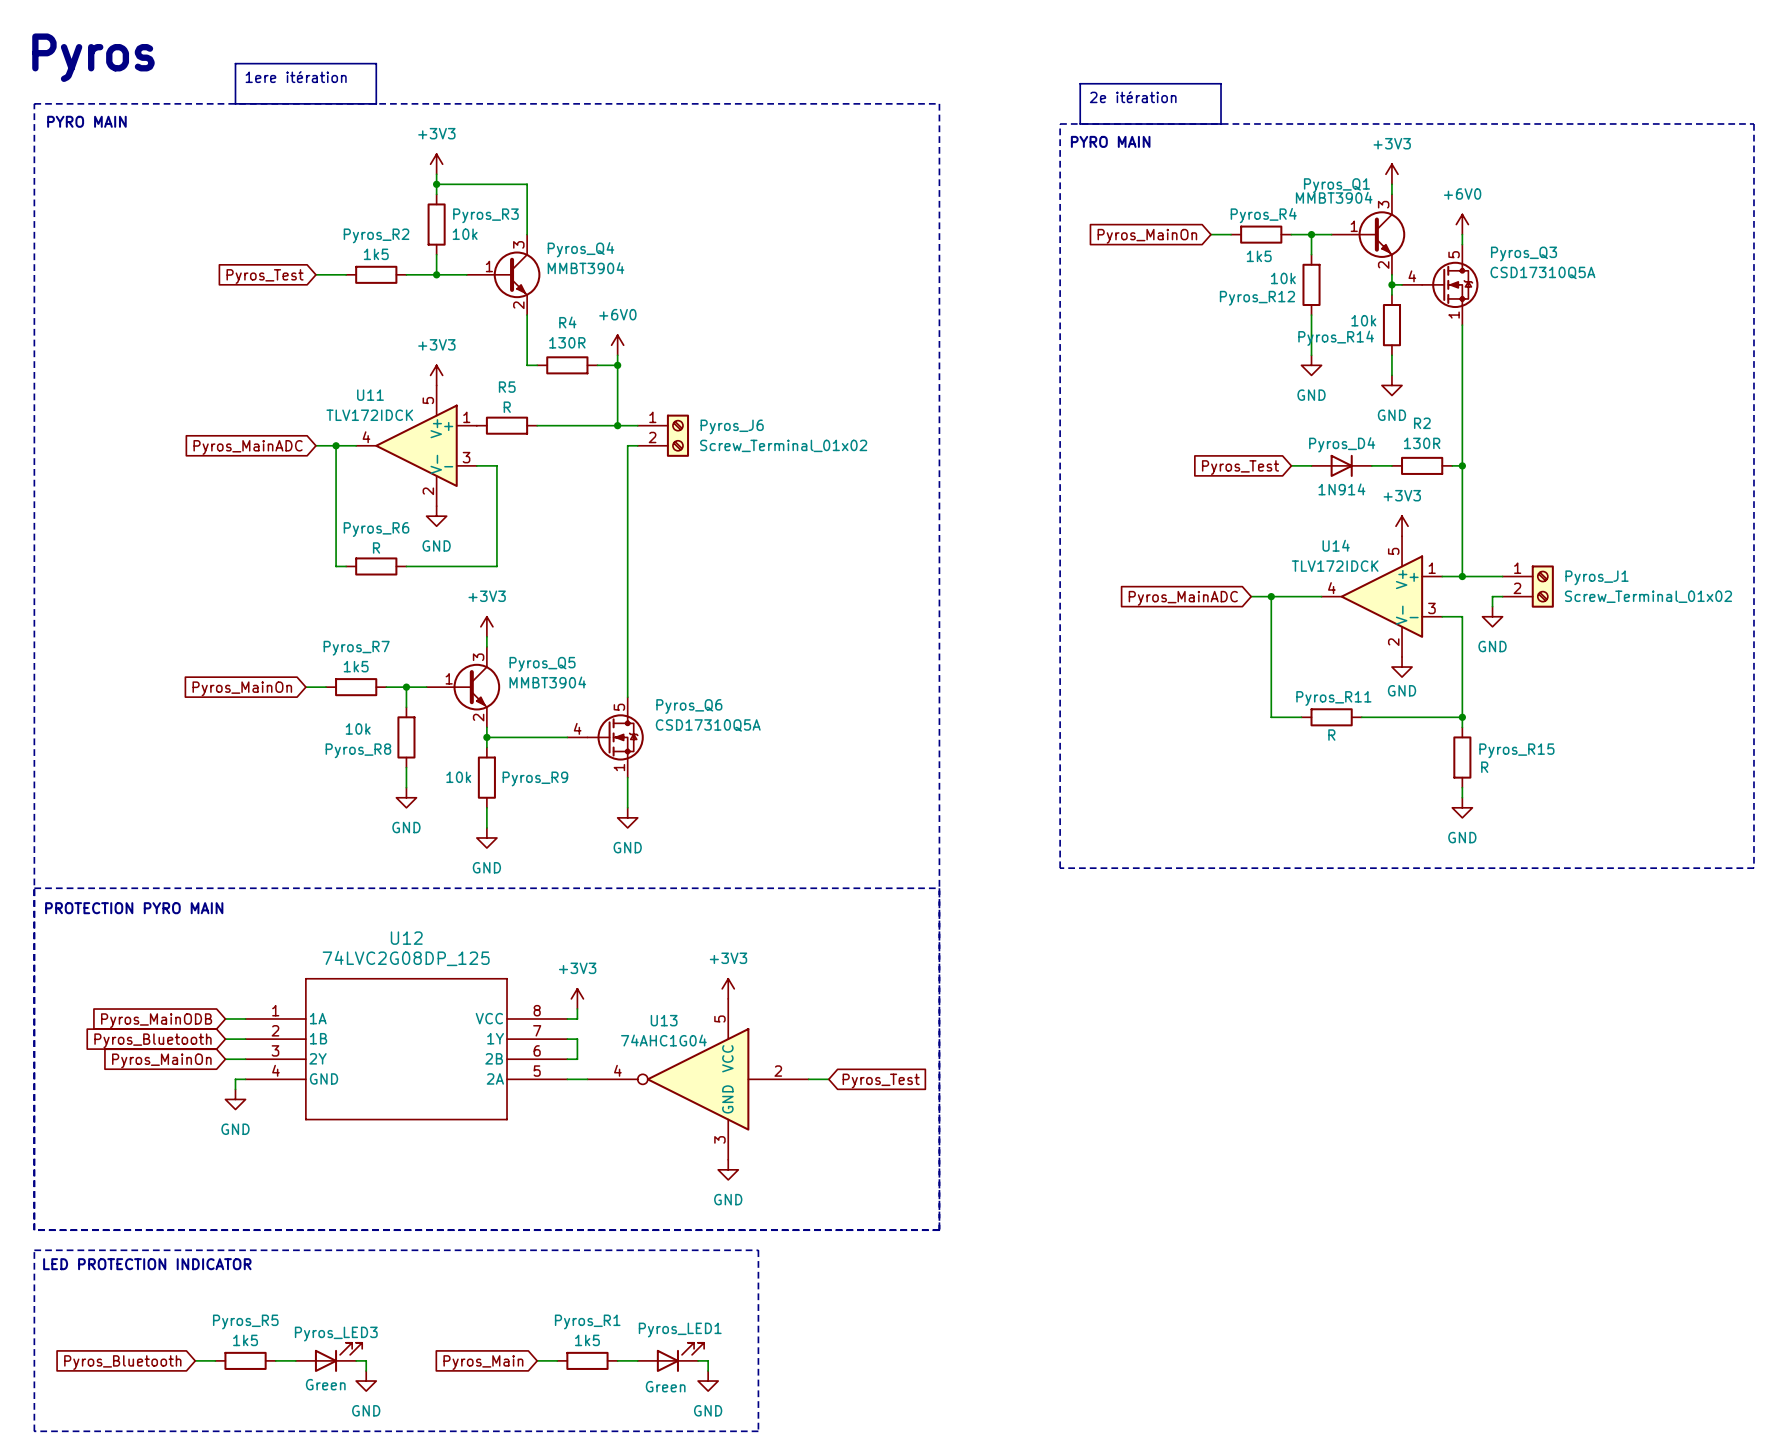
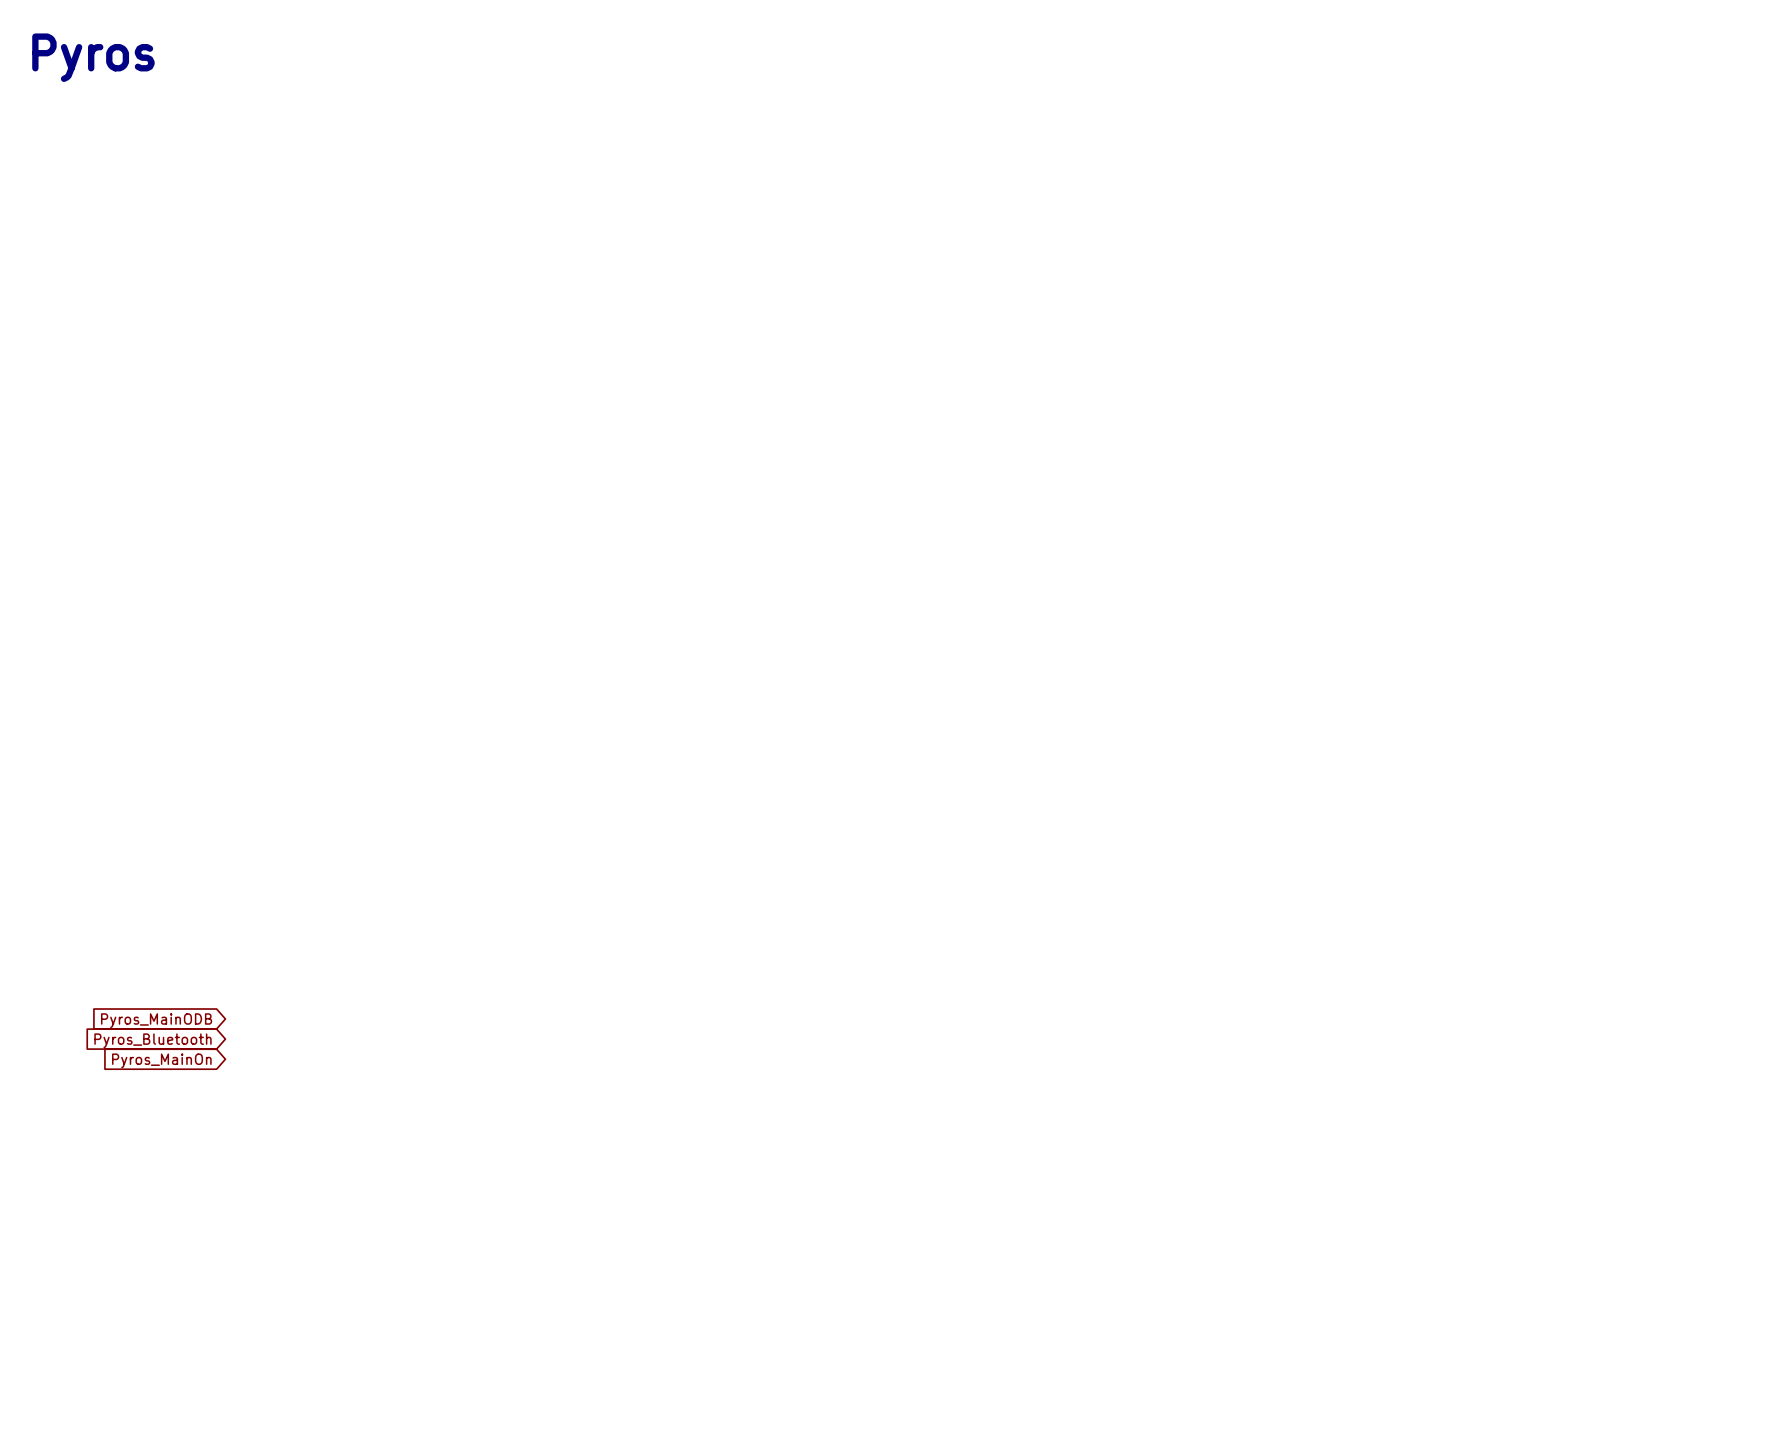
line: (235, 63) (376, 63) (376, 103) (235, 103) (235, 63) -> none
text: 1ere itération (296, 77) -> none
line: (1080, 83) (1221, 83) (1221, 123) (1080, 123) (1080, 83) -> none
text: 2e itération (1133, 97) -> none
line: (34, 103) (939, 103) (939, 1230) (34, 1230) (34, 103) -> none
text: PYRO MAIN (86, 121) -> none
line: (1060, 123) (1753, 123) (1753, 868) (1060, 868) (1060, 123) -> none
text: PYRO MAIN (1110, 141) -> none
power symbol: +3V3 (436, 164) -> none
wire: (436, 174) (436, 194) -> none
power symbol: +3V3 (1391, 174) -> none
wire: (436, 184) (527, 184) (527, 234) -> none
junction: (436, 184) -> none
wire: (1391, 184) (1391, 194) -> none
Pyros_R3: 10k (436, 224) -> none
power symbol: +6V0 (1462, 224) -> none
wire: (1210, 234) (1231, 234) -> none
Pyros_R4: 1k5 (1261, 234) -> none
wire: (1291, 234) (1331, 234) -> none
wire: (1311, 234) (1311, 254) -> none
junction: (1311, 234) -> none
Pyros_Q1: MMBT3904 (1368, 234) -> none
wire: (1462, 234) (1462, 244) -> none
global label: Pyros_MainOn (1147, 236) -> none
wire: (436, 254) (436, 274) -> none
wire: (315, 274) (346, 274) -> none
Pyros_R2: 1k5 (376, 274) -> none
wire: (406, 274) (466, 274) -> none
junction: (436, 274) -> none
Pyros_Q4: MMBT3904 (503, 274) -> none
wire: (1391, 274) (1391, 294) -> none
global label: Pyros_Test (265, 276) -> none
Pyros_R12: 10k (1311, 284) -> none
wire: (1391, 284) (1402, 284) -> none
junction: (1391, 284) -> none
Pyros_Q3: CSD17310Q5A (1440, 284) -> none
wire: (527, 315) (527, 365) (537, 365) -> none
wire: (1311, 315) (1311, 355) -> none
Pyros_R14: 10k (1391, 325) -> none
wire: (1462, 325) (1462, 576) -> none
power symbol: +6V0 (617, 345) -> none
wire: (617, 355) (617, 425) -> none
wire: (1391, 355) (1391, 375) -> none
R4: 130R (567, 365) -> none
wire: (597, 365) (617, 365) -> none
junction: (617, 365) -> none
power symbol: GND (1311, 365) -> none
power symbol: +3V3 (436, 375) -> none
power symbol: GND (1391, 385) -> none
R5: R (507, 425) -> none
wire: (537, 425) (637, 425) -> none
junction: (617, 425) -> none
Pyros_J6: Screw_Terminal_01x02 (663, 435) -> none
wire: (315, 445) (356, 445) -> none
wire: (336, 445) (336, 566) (346, 566) -> none
junction: (336, 445) -> none
U11: TLV172IDCK (416, 445) -> none
wire: (637, 445) (627, 445) (627, 697) -> none
global label: Pyros_MainADC (248, 447) -> none
wire: (476, 465) (496, 465) (496, 566) (406, 566) -> none
wire: (1291, 465) (1311, 465) -> none
Pyros_D4: 1N914 (1341, 465) -> none
wire: (1371, 465) (1391, 465) -> none
R2: 130R (1422, 465) -> none
wire: (1452, 465) (1462, 465) -> none
junction: (1462, 465) -> none
global label: Pyros_Test (1240, 467) -> none
power symbol: GND (436, 516) -> none
power symbol: +3V3 (1402, 526) -> none
Pyros_R6: R (376, 566) -> none
wire: (1442, 576) (1502, 576) -> none
junction: (1462, 576) -> none
Pyros_J1: Screw_Terminal_01x02 (1528, 586) -> none
wire: (1251, 596) (1321, 596) -> none
wire: (1271, 596) (1271, 717) (1301, 717) -> none
junction: (1271, 596) -> none
U14: TLV172IDCK (1381, 596) -> none
wire: (1502, 596) (1492, 596) (1492, 606) -> none
global label: Pyros_MainADC (1183, 598) -> none
wire: (1442, 616) (1462, 616) (1462, 727) -> none
power symbol: GND (1492, 616) -> none
power symbol: +3V3 (486, 626) -> none
wire: (486, 636) (486, 646) -> none
power symbol: GND (1402, 667) -> none
wire: (305, 687) (326, 687) -> none
Pyros_R7: 1k5 (356, 687) -> none
wire: (386, 687) (426, 687) -> none
wire: (406, 687) (406, 707) -> none
junction: (406, 687) -> none
Pyros_Q5: MMBT3904 (463, 687) -> none
global label: Pyros_MainOn (242, 688) -> none
Pyros_R11: R (1331, 717) -> none
wire: (1361, 717) (1462, 717) -> none
junction: (1462, 717) -> none
wire: (486, 727) (486, 747) -> none
Pyros_R8: 10k (406, 737) -> none
wire: (486, 737) (567, 737) -> none
junction: (486, 737) -> none
Pyros_Q6: CSD17310Q5A (605, 737) -> none
Pyros_R15: R (1462, 757) -> none
wire: (406, 767) (406, 787) -> none
Pyros_R9: 10k (486, 777) -> none
wire: (627, 777) (627, 807) -> none
wire: (1462, 787) (1462, 797) -> none
power symbol: GND (406, 797) -> none
wire: (486, 807) (486, 827) -> none
power symbol: GND (1462, 807) -> none
power symbol: GND (627, 817) -> none
power symbol: GND (486, 837) -> none
line: (34, 888) (939, 888) -> none
text: PROTECTION PYRO MAIN (134, 908) -> none
power symbol: +3V3 (728, 988) -> none
power symbol: +3V3 (577, 998) -> none
wire: (577, 1008) (577, 1019) (567, 1019) -> none
wire: (225, 1019) (245, 1019) -> none
wire: (225, 1039) (245, 1039) -> none
wire: (567, 1039) (577, 1039) (577, 1059) (567, 1059) -> none
U12: 74LVC2G08DP_125 (406, 1049) -> none
wire: (225, 1059) (245, 1059) -> none
wire: (245, 1079) (235, 1079) (235, 1089) -> none
wire: (567, 1079) (587, 1079) -> none
U13: 74AHC1G04 (698, 1079) -> none
wire: (808, 1079) (828, 1079) -> none
global label: Pyros_Test (881, 1081) -> none
power symbol: GND (235, 1099) -> none
power symbol: GND (728, 1169) -> none
line: (34, 1250) (34, 1431) (758, 1431) (758, 1250) (34, 1250) -> none
text: LED PROTECTION INDICATOR (147, 1264) -> none
Pyros_LED3: Green (329, 1357) -> none
Pyros_LED1: Green (670, 1357) -> none
wire: (195, 1360) (215, 1360) -> none
Pyros_R5: 1k5 (245, 1360) -> none
wire: (275, 1360) (295, 1360) -> none
wire: (356, 1360) (366, 1360) (366, 1370) -> none
wire: (537, 1360) (557, 1360) -> none
Pyros_R1: 1k5 (587, 1360) -> none
wire: (617, 1360) (637, 1360) -> none
wire: (698, 1360) (708, 1360) (708, 1370) -> none
global label: Pyros_Bluetooth (122, 1362) -> none
global label: Pyros_Main (483, 1362) -> none
power symbol: GND (366, 1381) -> none
power symbol: GND (708, 1381) -> none

